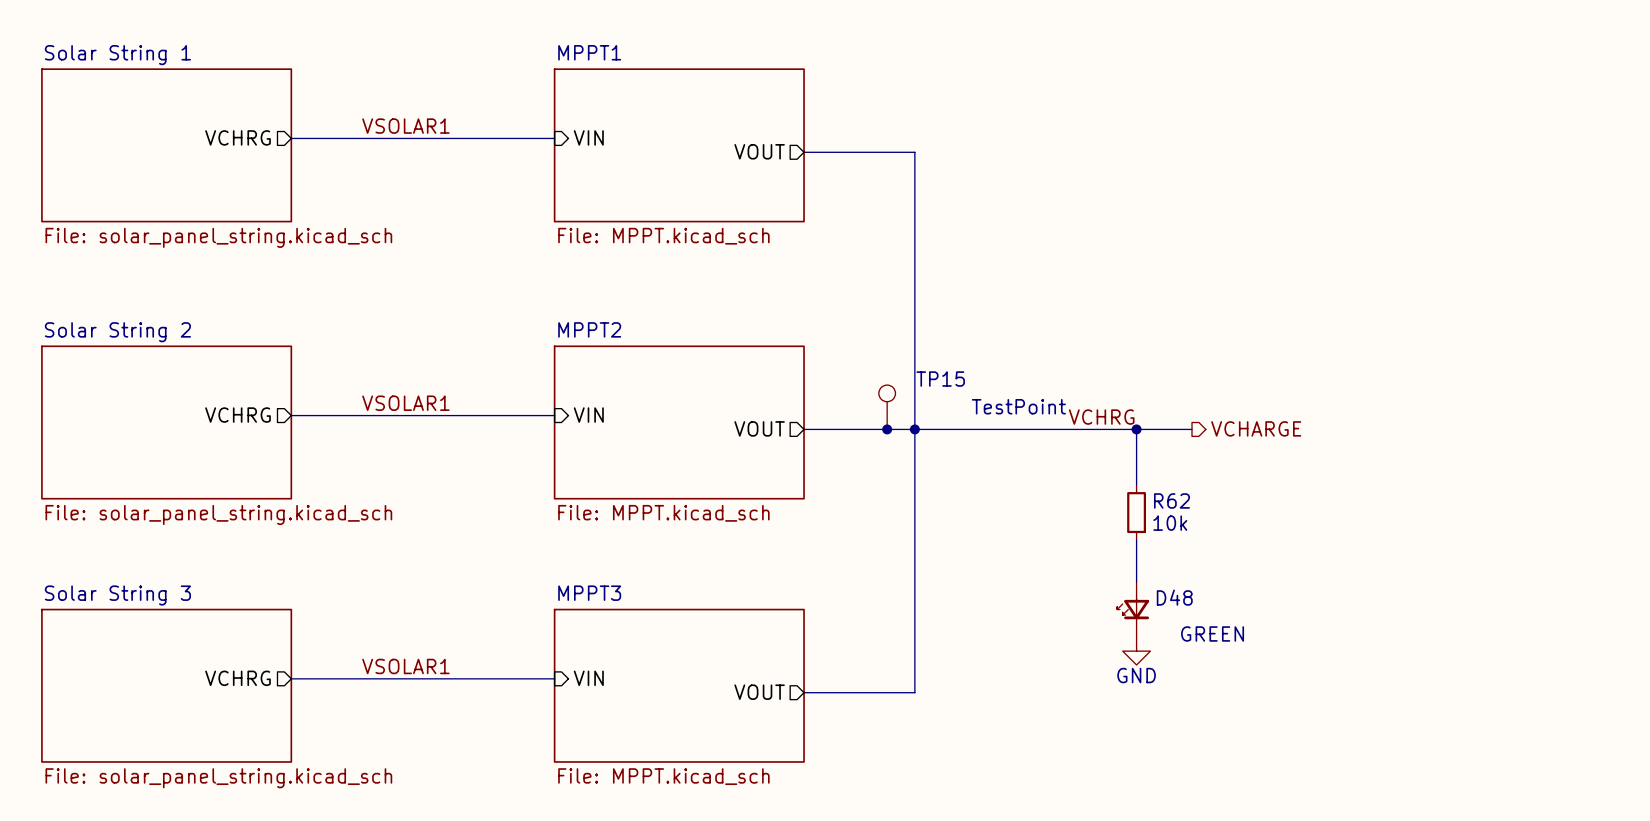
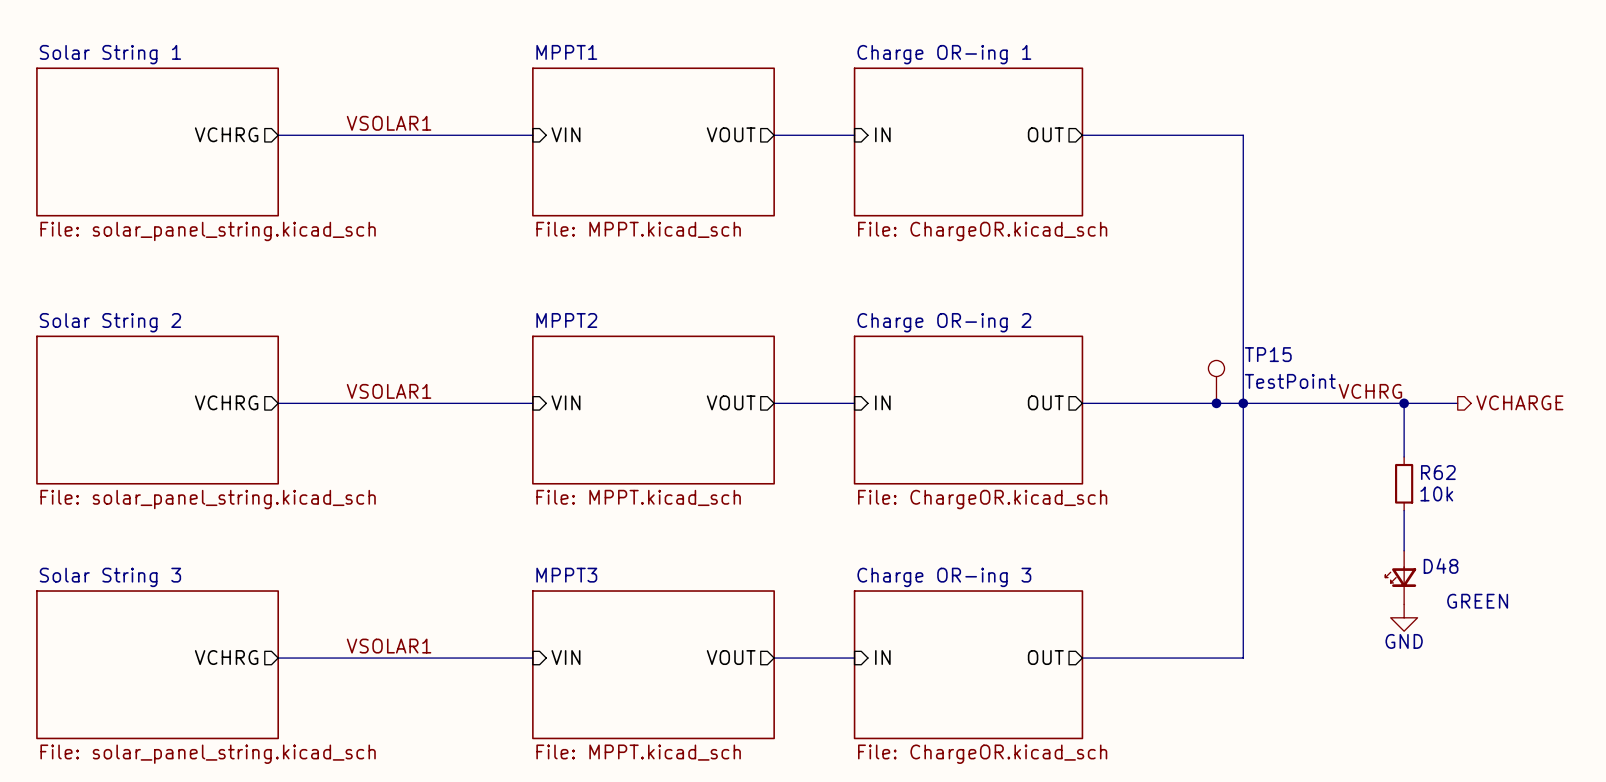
sheet pin: none -> IN (882, 134)
sheet pin: none -> OUT (1045, 134)
wire: none -> (774, 135) (854, 135)
wire: none -> (1082, 135) (1243, 135) (1243, 658) (1082, 658)
sheet Charge OR-ing 1: none -> File: ChargeOR.kicad_sch (968, 141)
sheet pin position: VOUT (759, 151) -> VOUT (731, 134)
wire: (804, 152) (914, 152) (914, 692) (804, 692) -> none
label: none -> VCHRG (1370, 391)
TP15 value position: TestPoint (1018, 406) -> TestPoint (1290, 381)
TP15 position: (887, 407) -> (1216, 381)
wire: none -> (774, 403) (854, 403)
sheet pin: none -> IN (882, 402)
sheet pin: none -> OUT (1045, 402)
wire: none -> (1082, 403) (1457, 403)
junction: none -> (1216, 403)
junction: none -> (1243, 403)
wire: none -> (1404, 403) (1404, 456)
junction: none -> (1404, 403)
hierarchical label: none -> VCHARGE (1519, 402)
label: VCHRG (1101, 417) -> none
sheet Charge OR-ing 2: none -> File: ChargeOR.kicad_sch (968, 410)
sheet pin position: VOUT (759, 428) -> VOUT (731, 402)
hierarchical label: VCHARGE (1256, 428) -> none
wire: (804, 429) (1191, 429) -> none
junction: (887, 429) -> none
junction: (914, 429) -> none
wire: (1136, 429) (1136, 484) -> none
junction: (1136, 429) -> none
R62 position: (1136, 512) -> (1404, 483)
wire: none -> (1404, 510) (1404, 550)
wire: (1136, 540) (1136, 581) -> none
D48 position: (1133, 609) -> (1400, 577)
power symbol: none -> GND (1404, 617)
power symbol: GND (1136, 651) -> none
wire: none -> (774, 658) (854, 658)
sheet pin: none -> IN (882, 657)
sheet pin: none -> OUT (1045, 657)
sheet Charge OR-ing 3: none -> File: ChargeOR.kicad_sch (968, 664)
sheet pin position: VOUT (759, 692) -> VOUT (731, 657)

